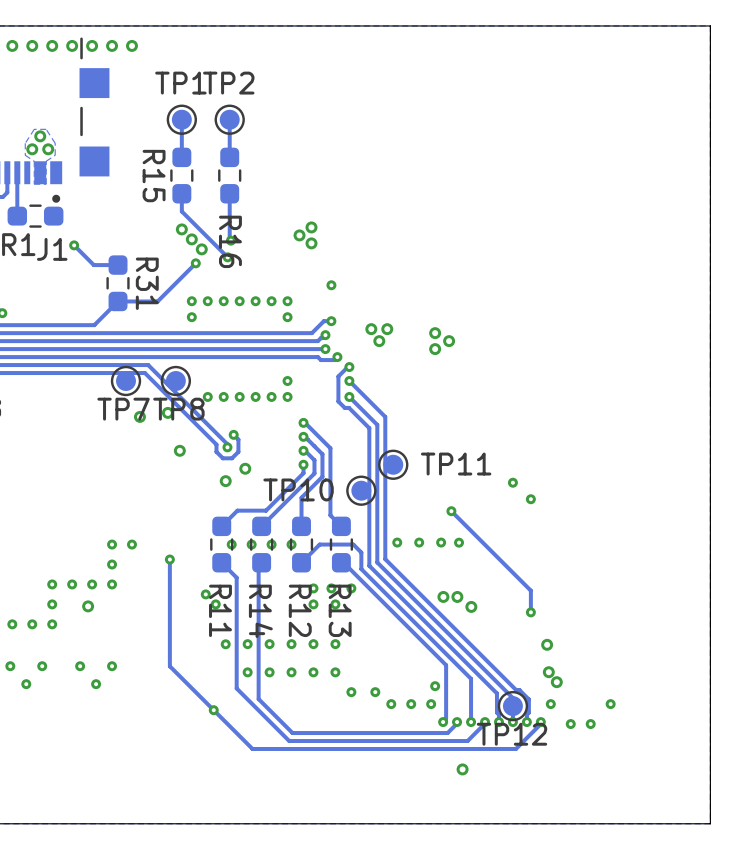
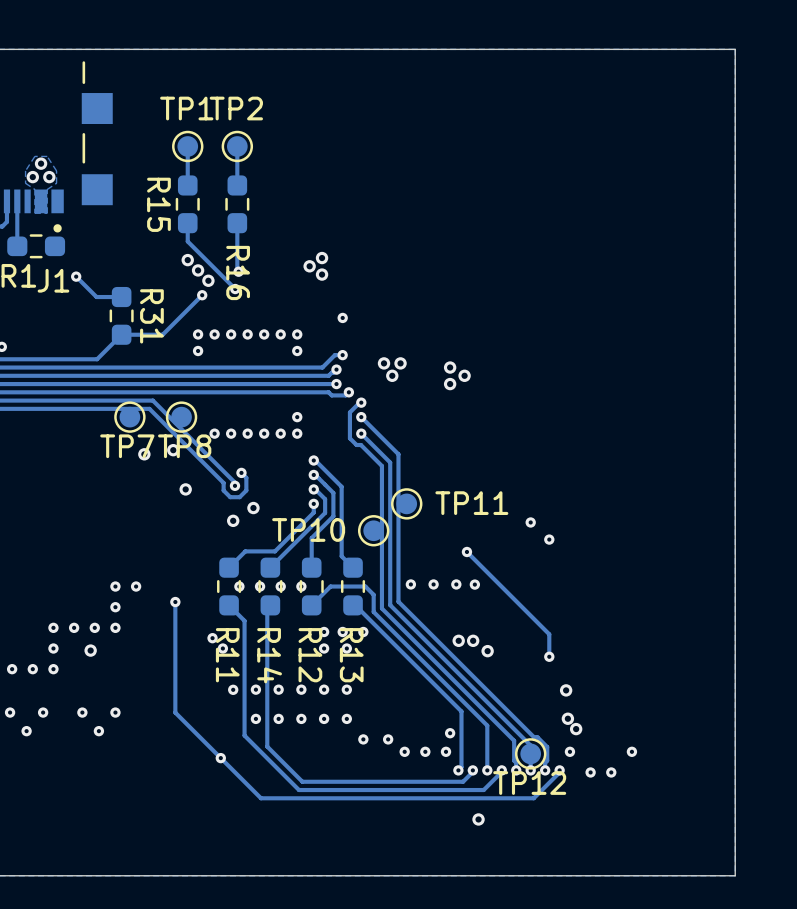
via: (12, 45) -> none
via: (32, 45) -> none
via: (52, 45) -> none
via: (72, 45) -> none
via: (92, 45) -> none
via: (112, 45) -> none
via: (131, 45) -> none

